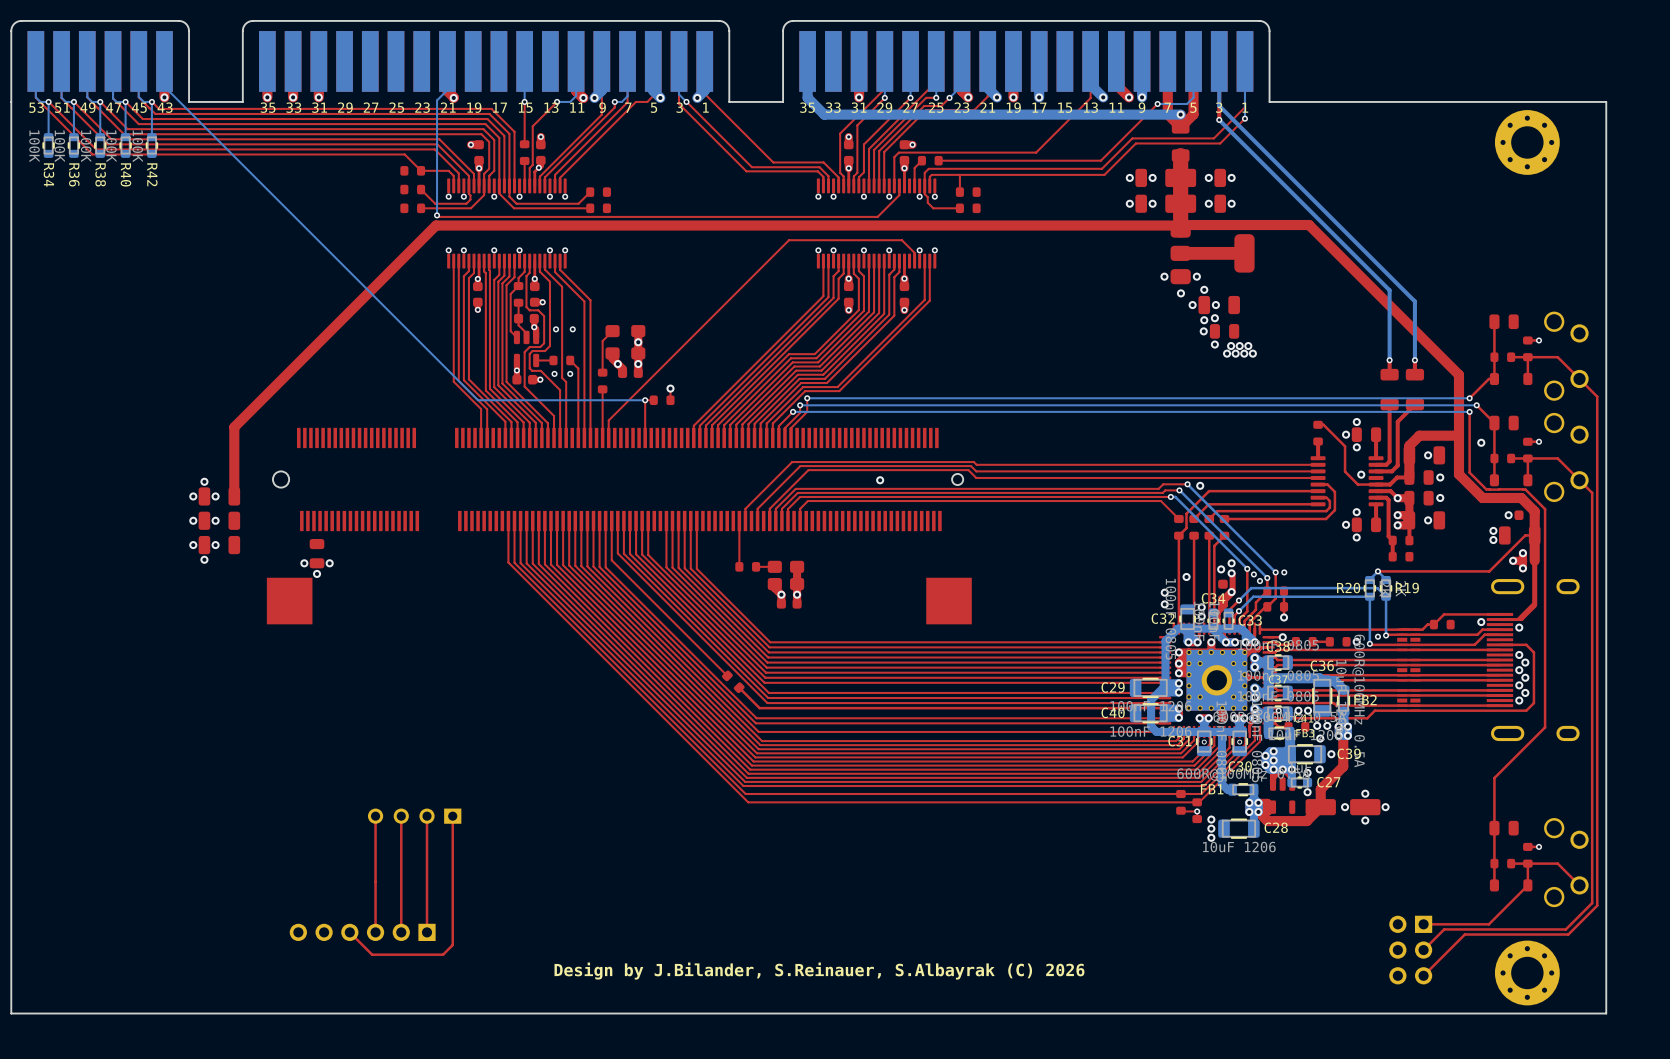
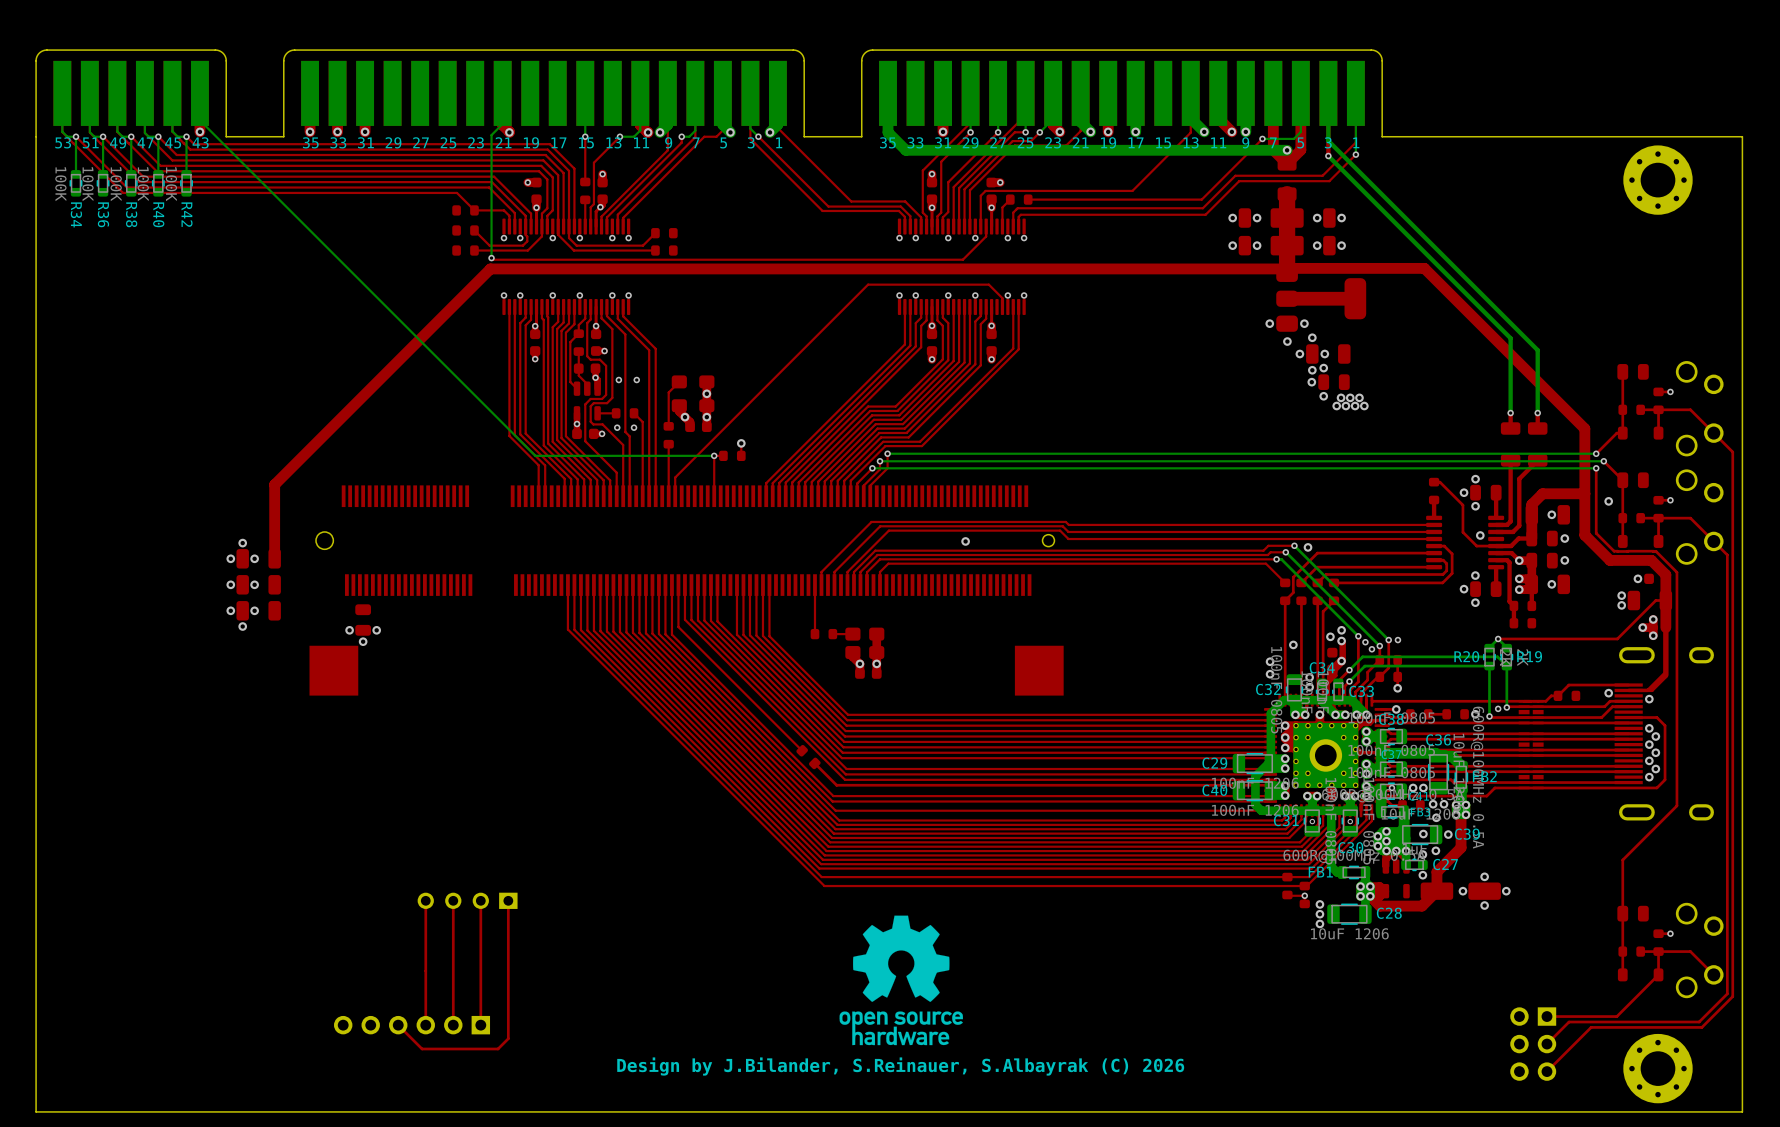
top track: (959, 174) (959, 192) -> none
top track: (924, 185) (927, 202) (933, 208) (959, 208) -> none
part: (968, 192) -> none
part: (968, 208) -> none
drawing: none -> [839, 915, 963, 1046]

